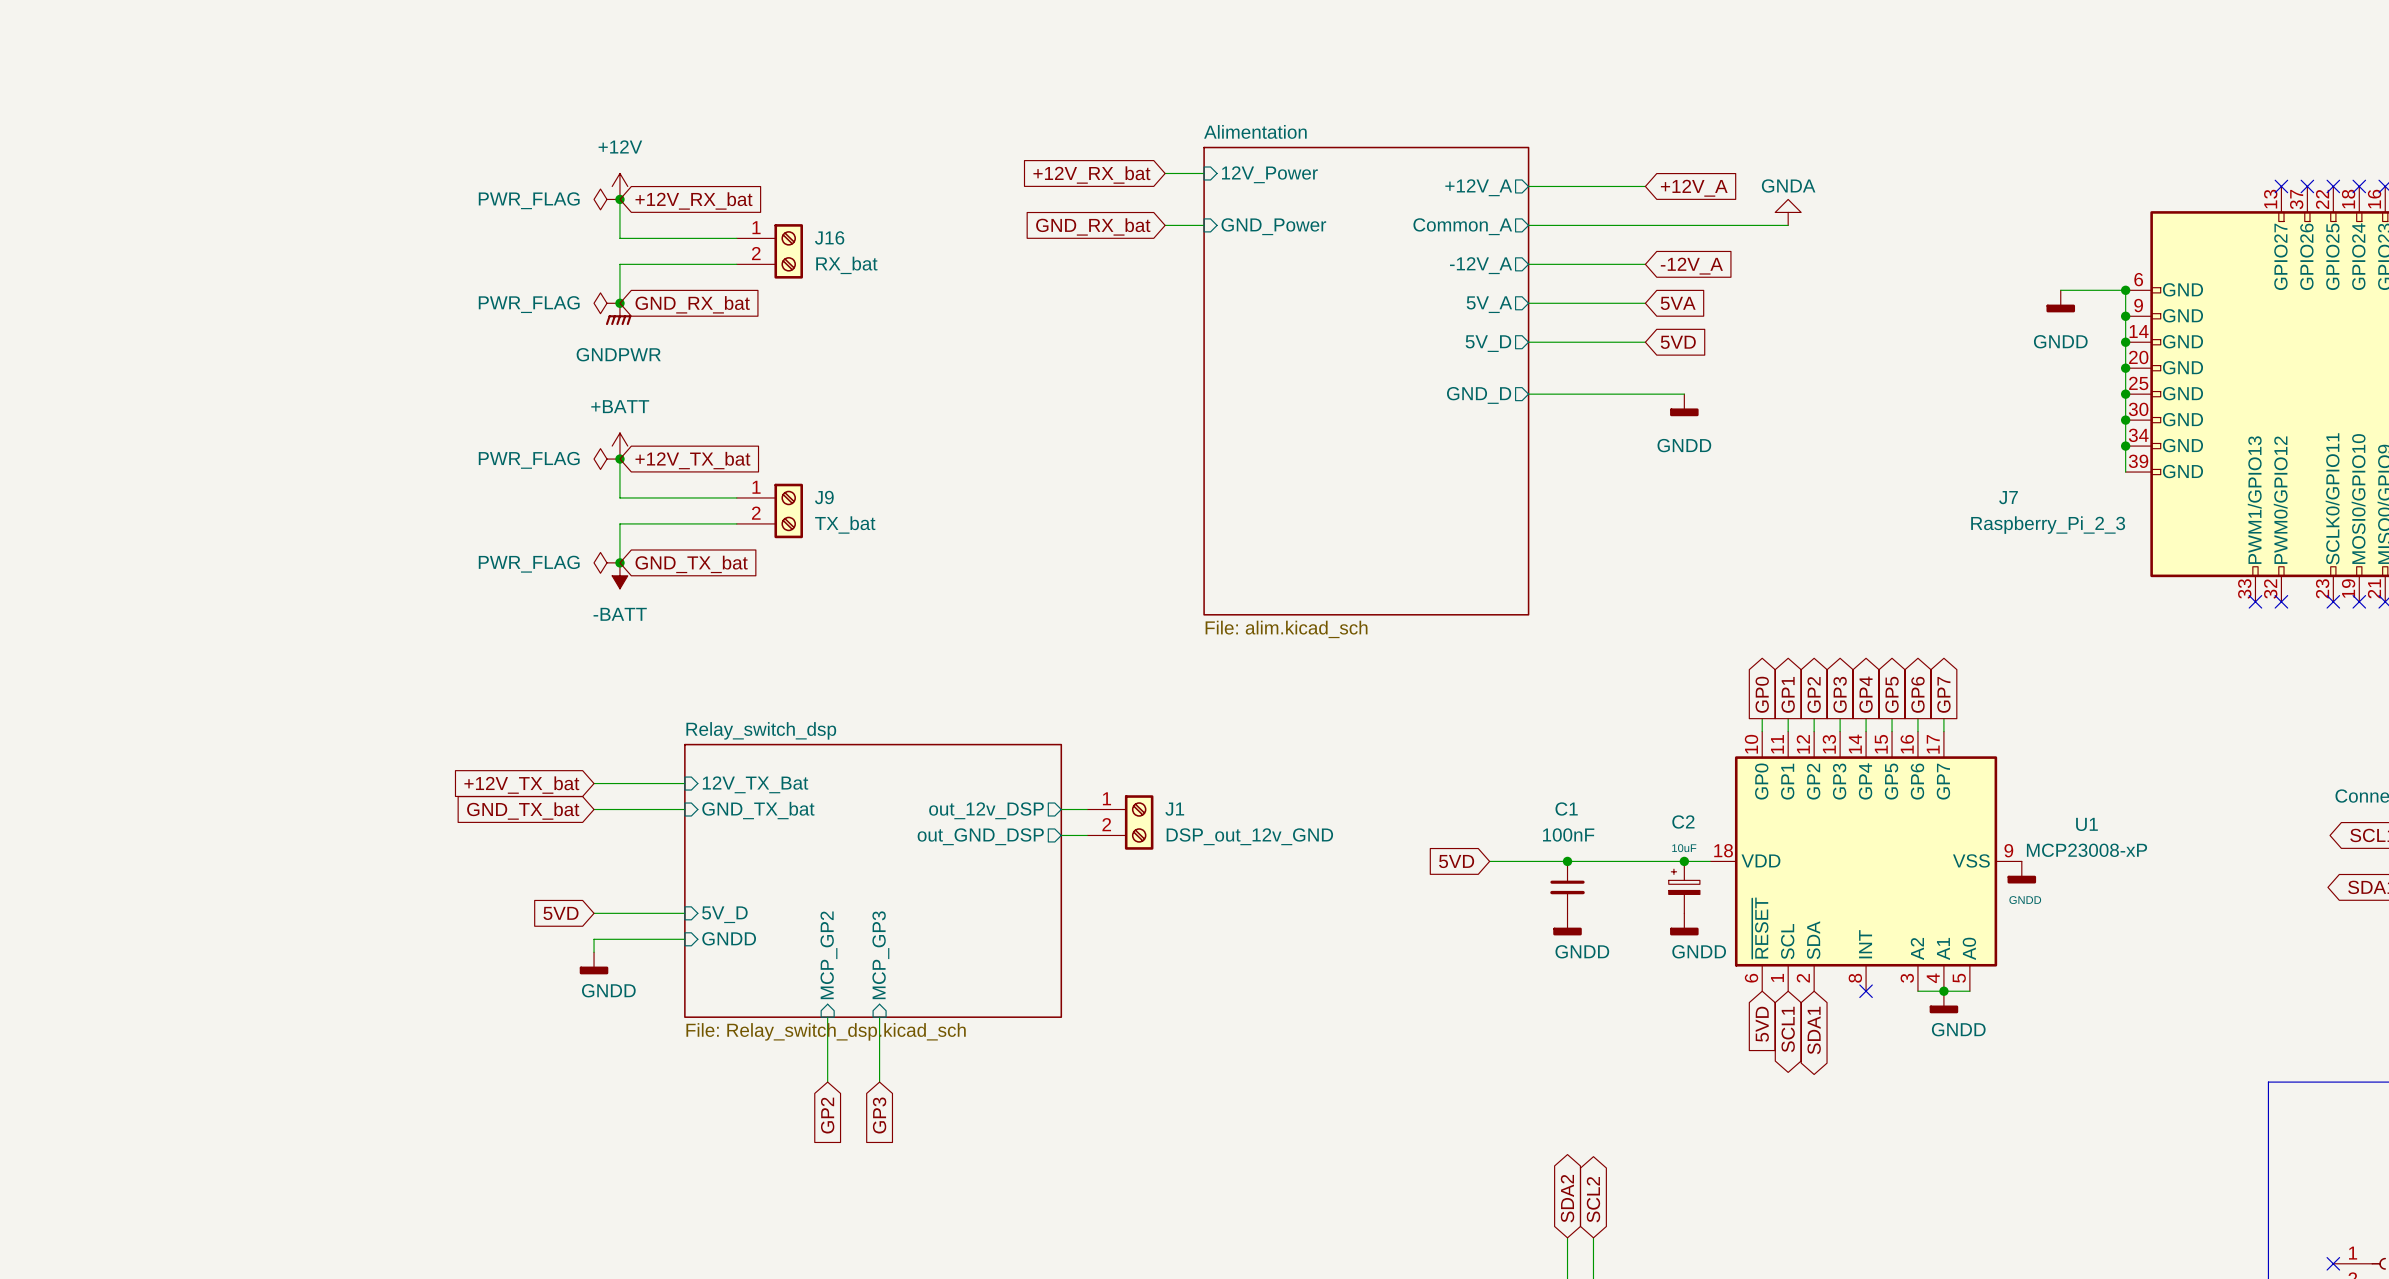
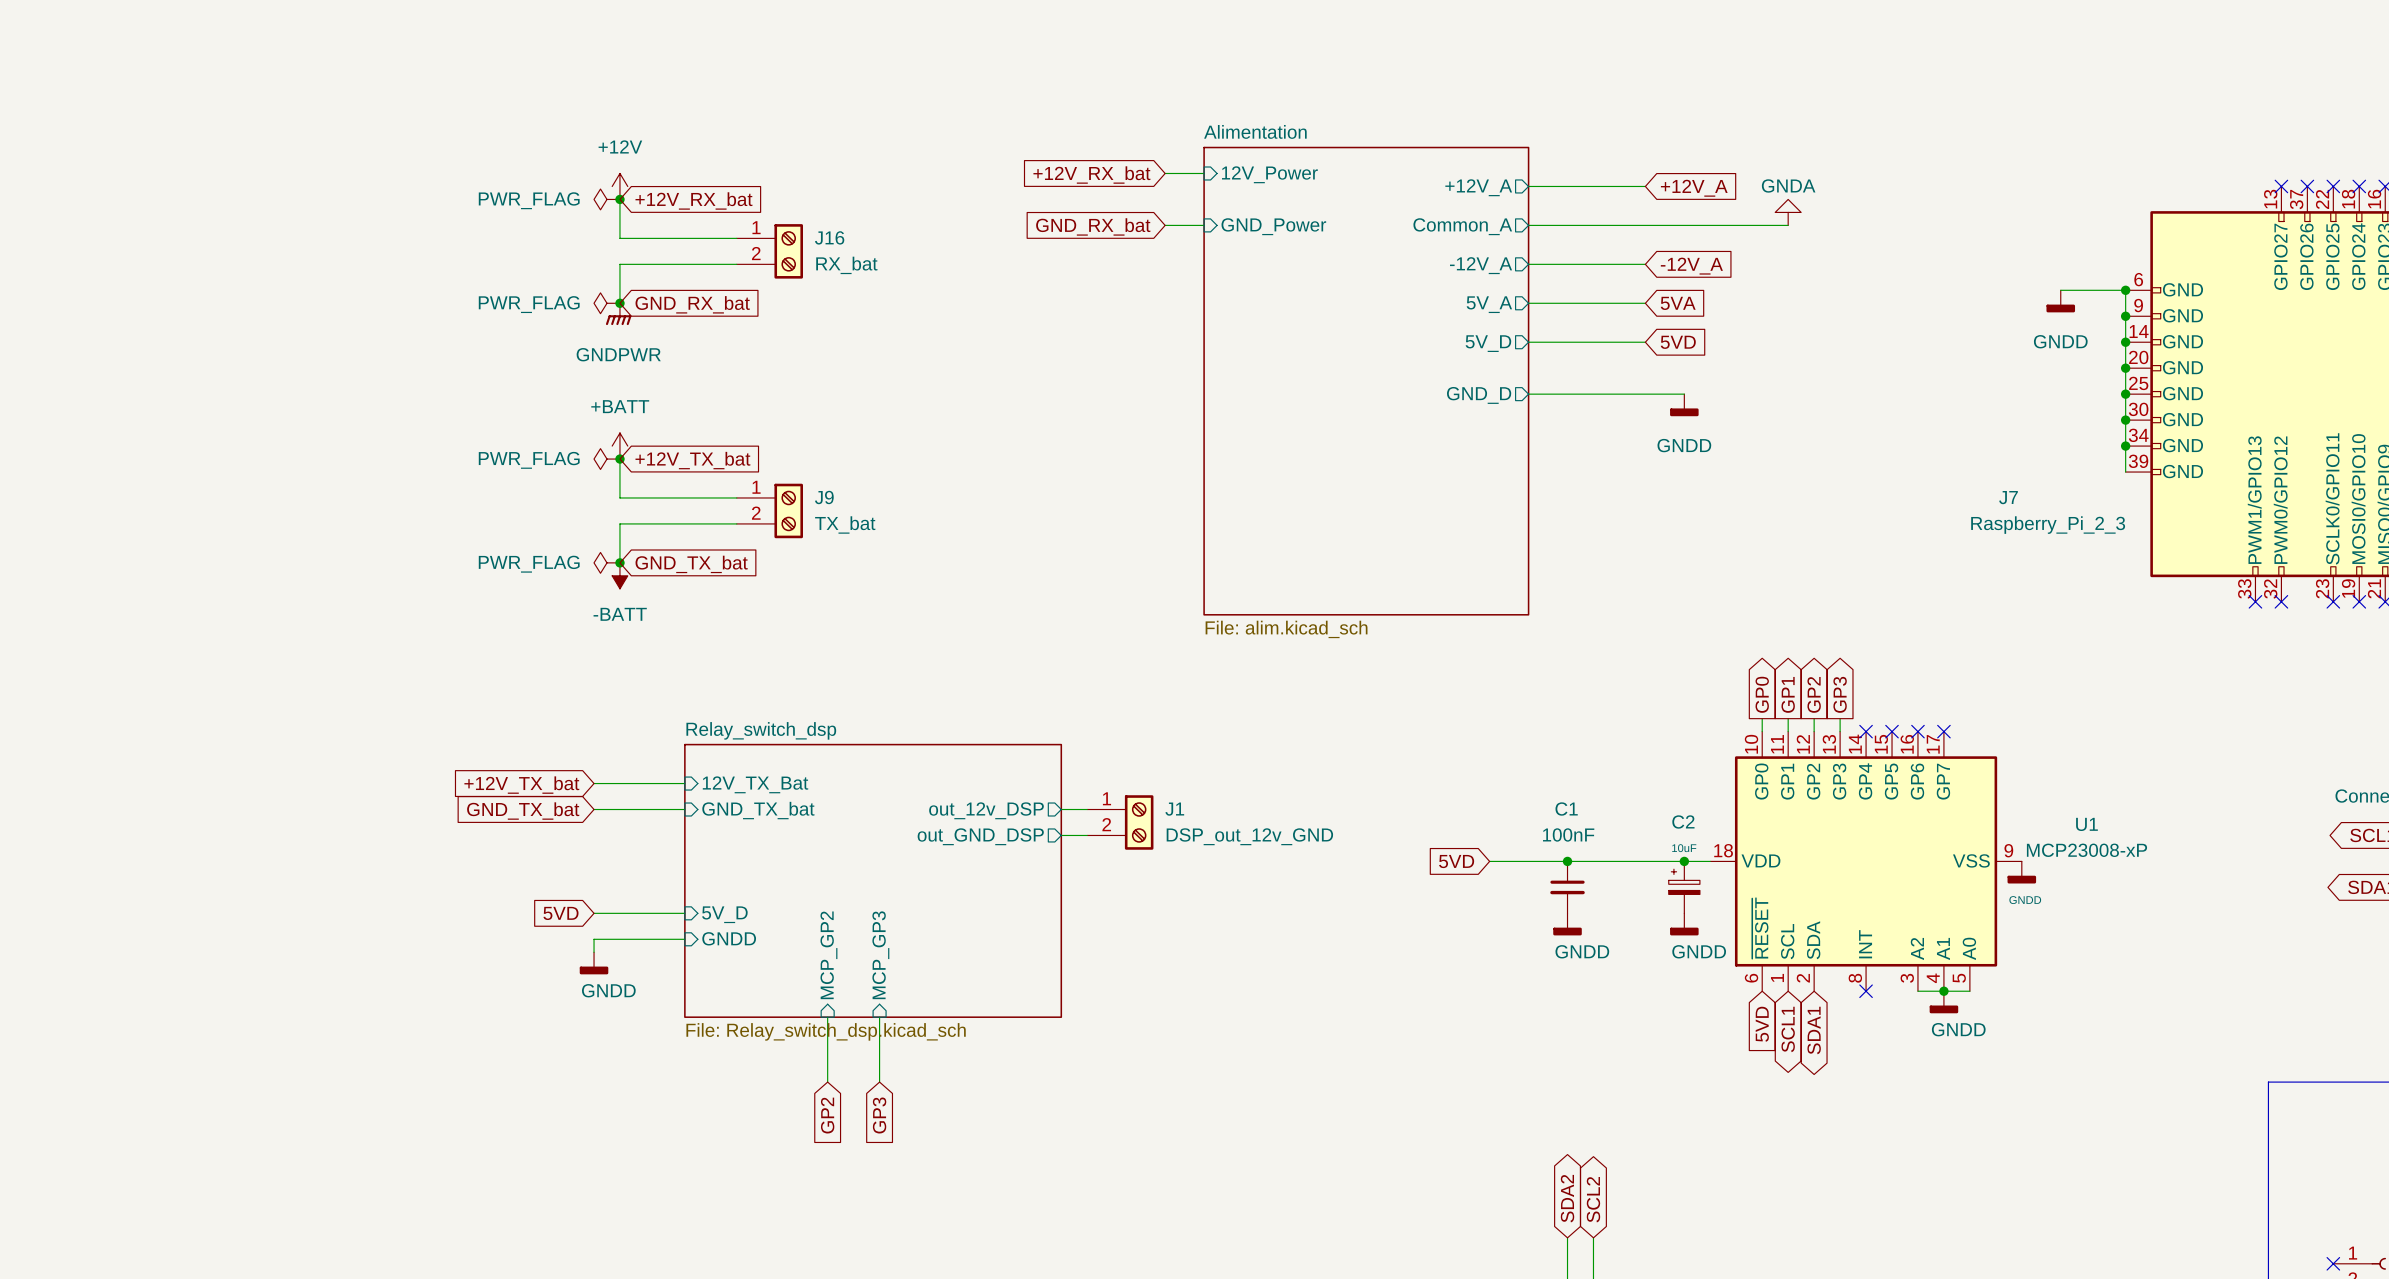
global label: GP4 (1866, 694) -> none
global label: GP5 (1892, 694) -> none
global label: GP6 (1917, 694) -> none
global label: GP7 (1943, 694) -> none
wire: (1866, 718) (1866, 731) -> none
wire: (1892, 718) (1892, 731) -> none
wire: (1917, 718) (1917, 731) -> none
wire: (1943, 718) (1943, 731) -> none
no-connect mark: none -> (1866, 731)
no-connect mark: none -> (1892, 731)
no-connect mark: none -> (1917, 731)
no-connect mark: none -> (1943, 731)

